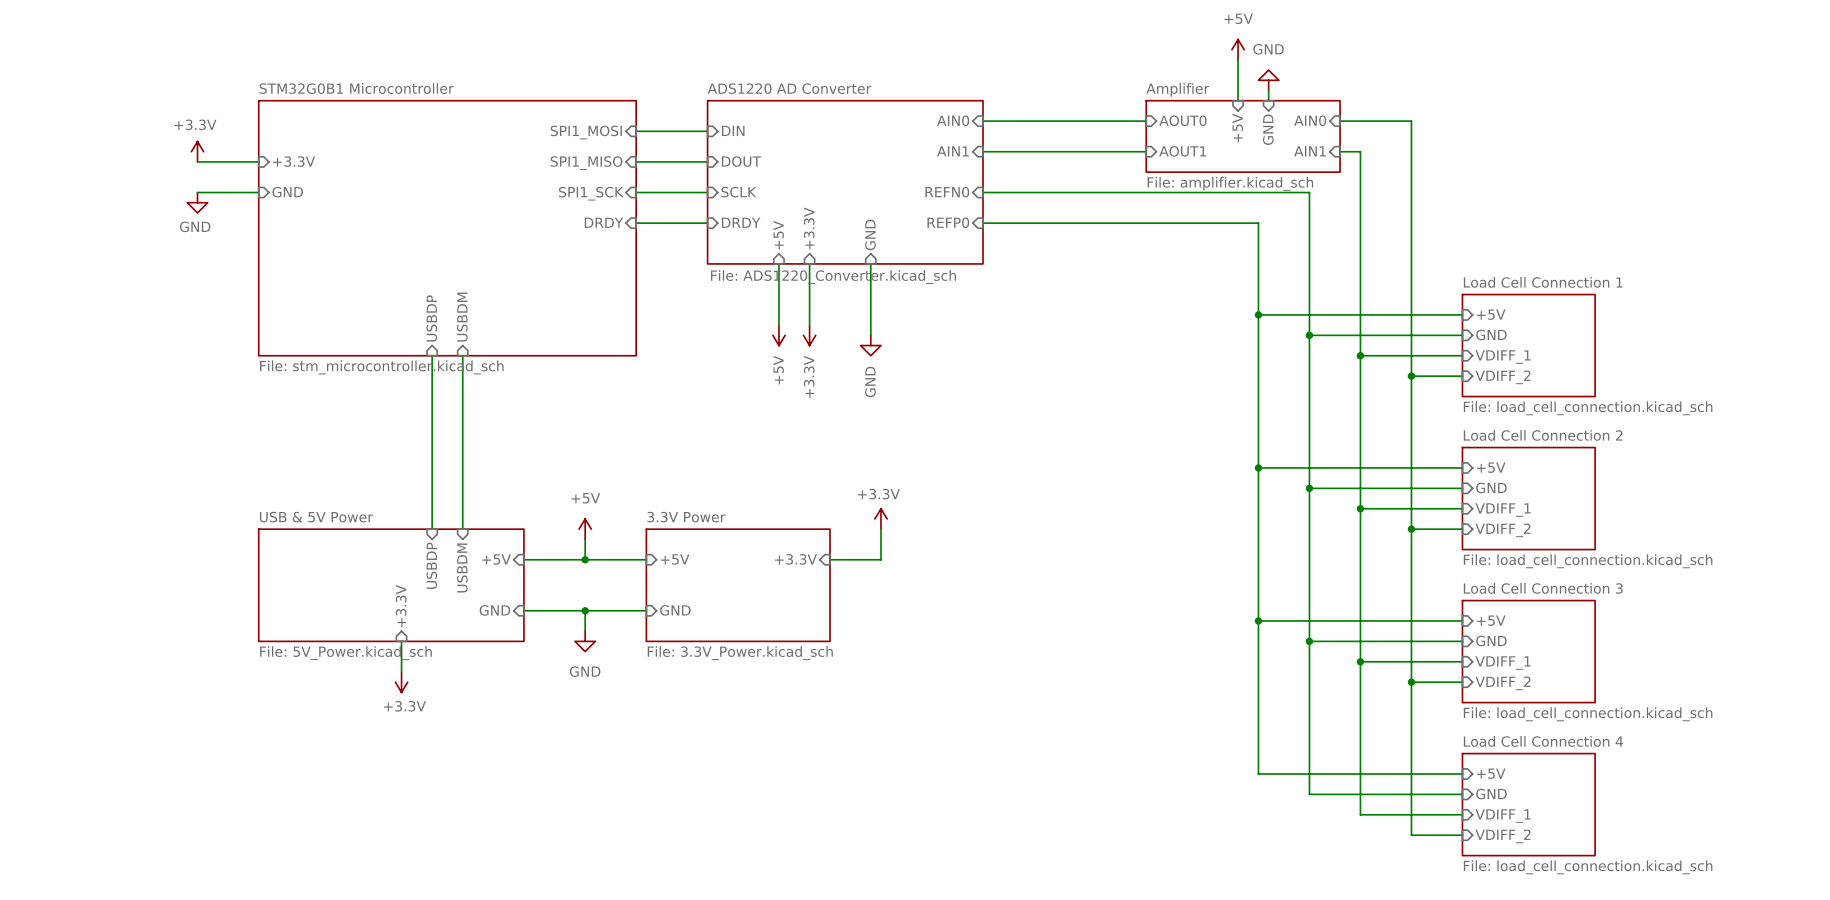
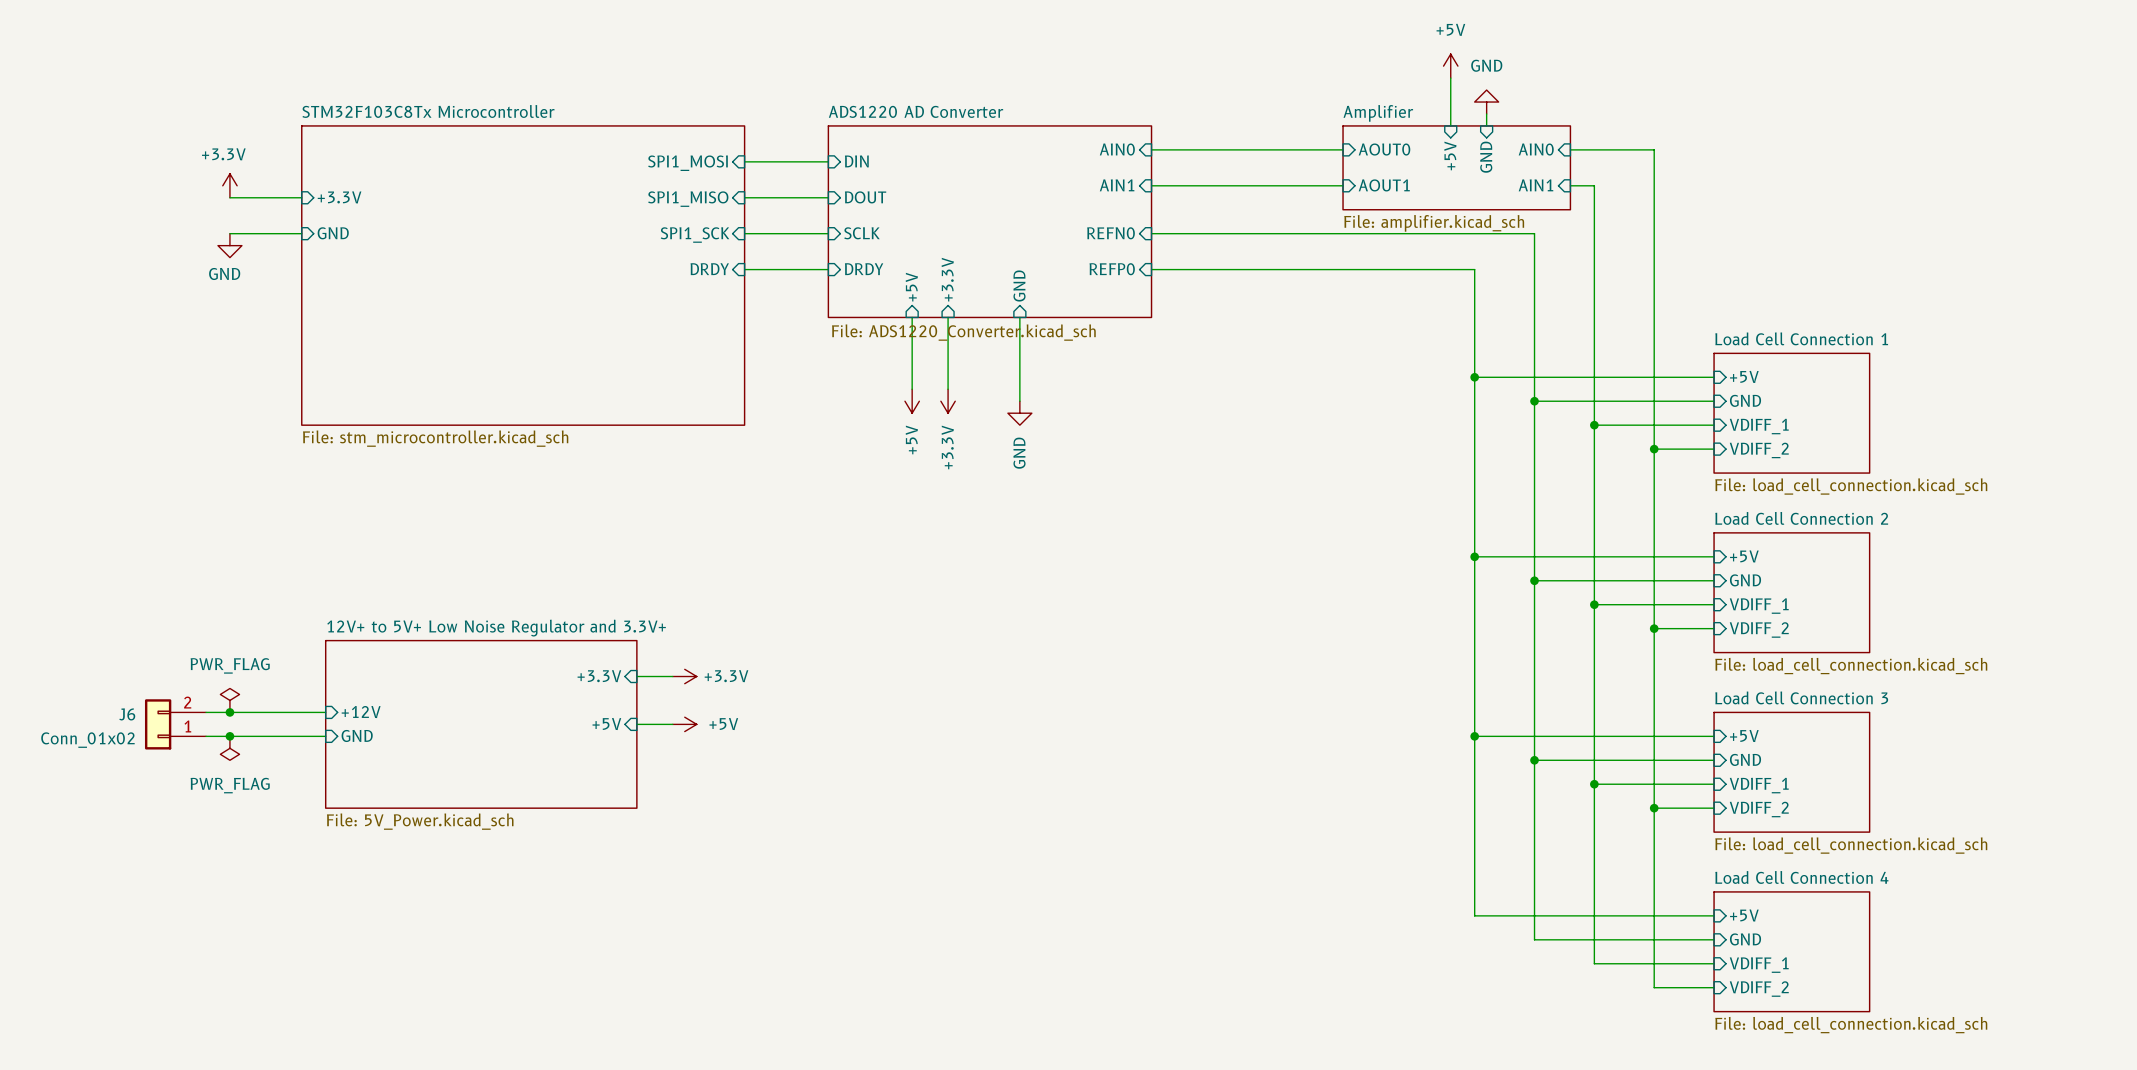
sheet STM32G0B1 Microcontroller name: STM32G0B1 Microcontroller (356, 88) -> STM32F103C8Tx Microcontroller (428, 111)
sheet pin: USBDM (462, 317) -> none
sheet pin: USBDP (431, 318) -> none
wire: (432, 355) (432, 529) -> none
wire: (462, 355) (462, 529) -> none
power symbol: +3.3V (880, 518) -> none
power symbol rotation: 0° (585, 529) -> 90° clockwise (684, 724)
power symbol position: +5V (585, 529) -> +5V (684, 724)
wire: (880, 529) (880, 559) (829, 559) -> none
wire: (585, 539) (585, 559) -> none
sheet pin position: +5V (496, 559) -> +5V (606, 724)
wire: (523, 559) (646, 559) -> none
junction: (585, 559) -> none
sheet pin: +5V (675, 559) -> none
sheet pin: +3.3V (795, 559) -> none
sheet pin: USBDP (431, 565) -> none
sheet pin: USBDM (462, 567) -> none
wire: none -> (636, 676) (672, 676)
power symbol: none -> +3.3V (684, 676)
sheet USB & 5V Power: File: 5V_Power.kicad_sch (391, 585) -> none
sheet 3.3V Power: File: 3.3V_Power.kicad_sch (738, 585) -> none
power symbol: none -> PWR_FLAG (229, 700)
wire: none -> (206, 712) (325, 712)
junction: none -> (229, 712)
sheet pin: none -> +12V (361, 712)
sheet pin rotation: 0° (401, 605) -> 90° counterclockwise (599, 676)
sheet pin position: +3.3V (401, 605) -> +3.3V (599, 676)
J6: none -> Conn_01x02 (175, 724)
sheet 12V+ to 5V+ Low Noise Regulator and 3.3V+: none -> File: 5V_Power.kicad_sch (481, 724)
sheet pin: GND (494, 610) -> none
wire: (523, 610) (544, 610) -> none
wire: (574, 610) (646, 610) -> none
wire: (585, 610) (585, 631) -> none
junction: (585, 610) -> none
sheet pin: GND (675, 610) -> none
wire: none -> (206, 736) (325, 736)
junction: none -> (229, 736)
sheet pin: none -> GND (357, 735)
power symbol: none -> PWR_FLAG (229, 748)
wire: (401, 641) (401, 671) -> none
power symbol: GND (585, 641) -> none
power symbol: +3.3V (401, 682) -> none

